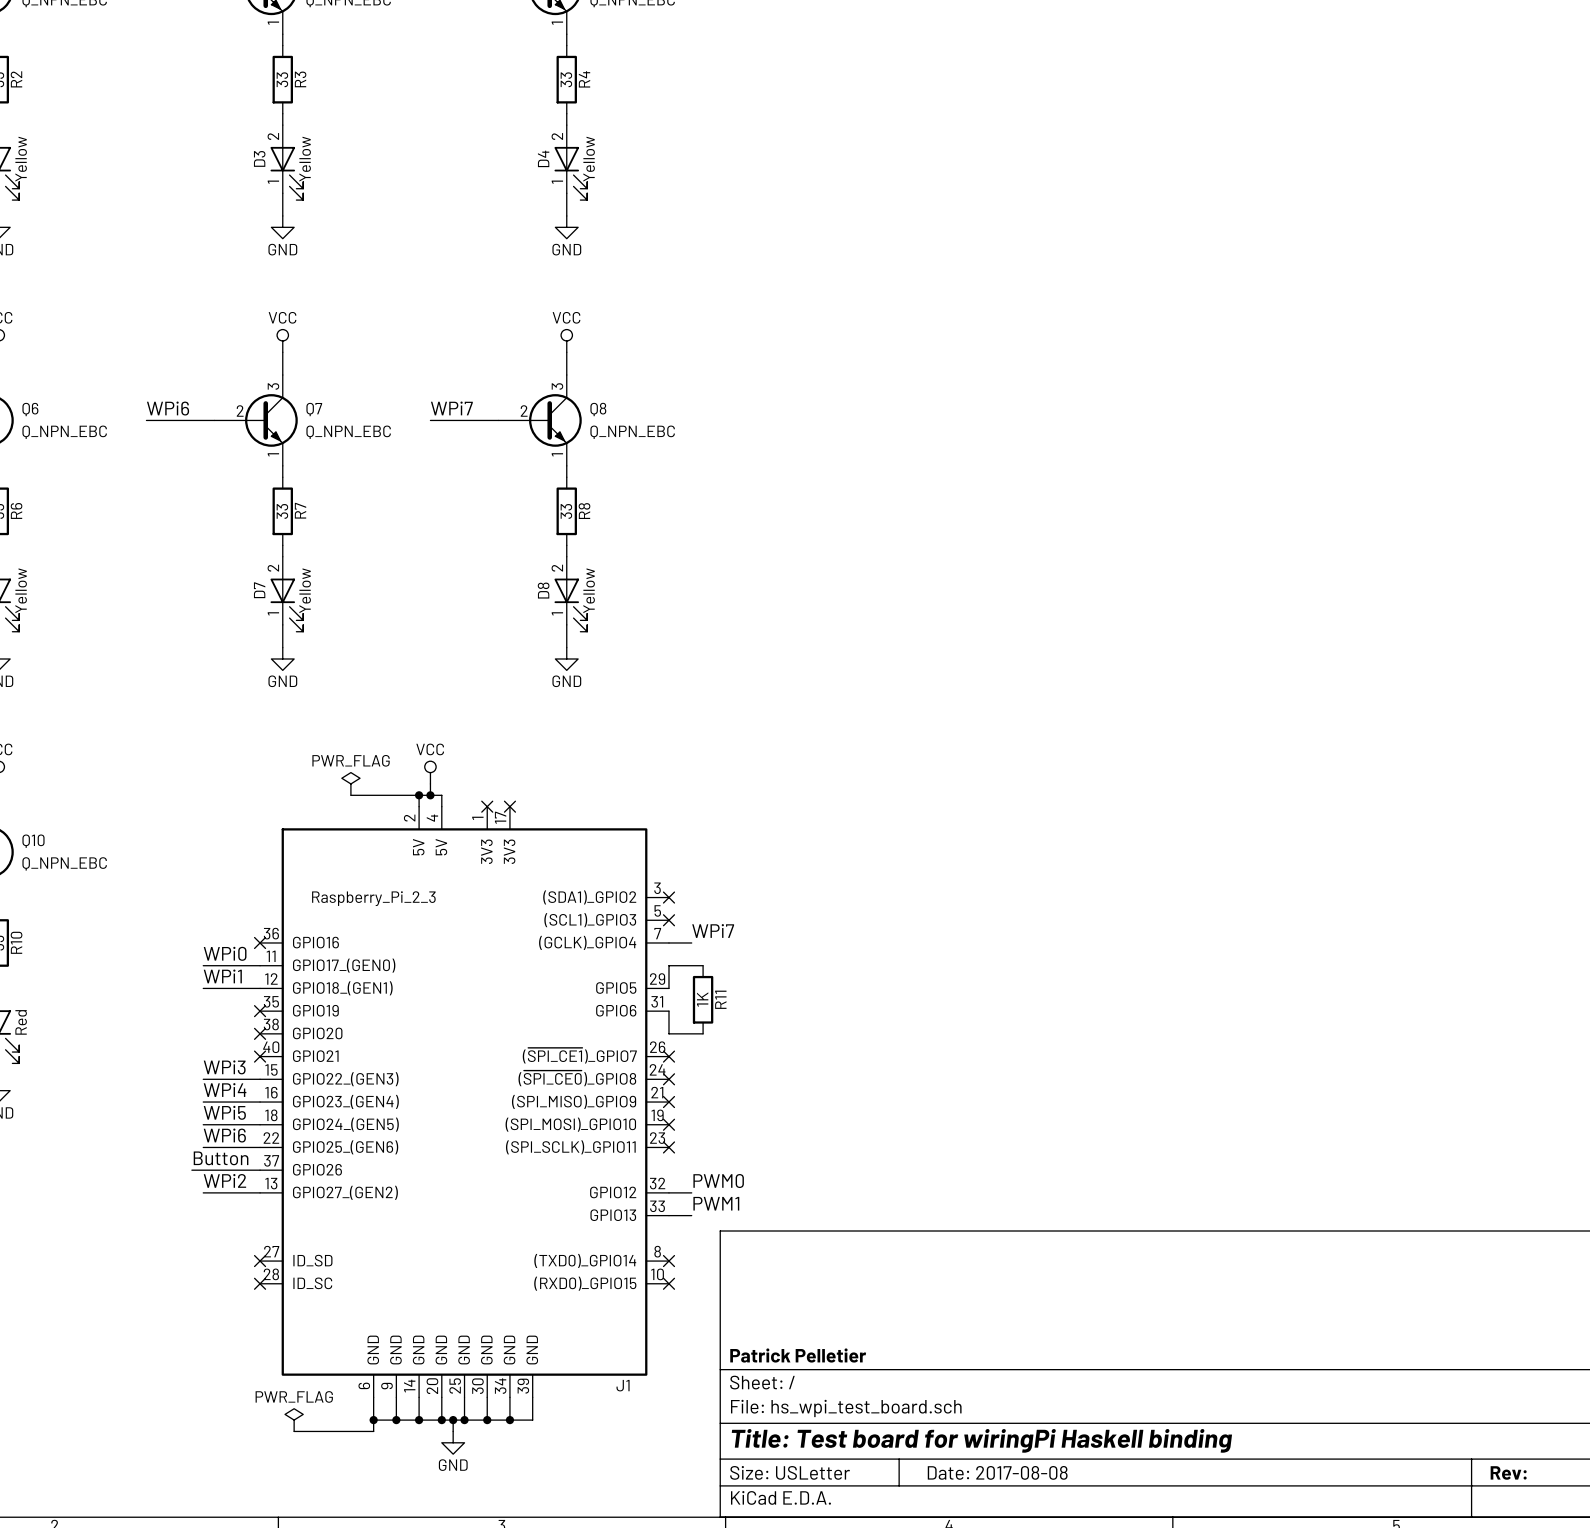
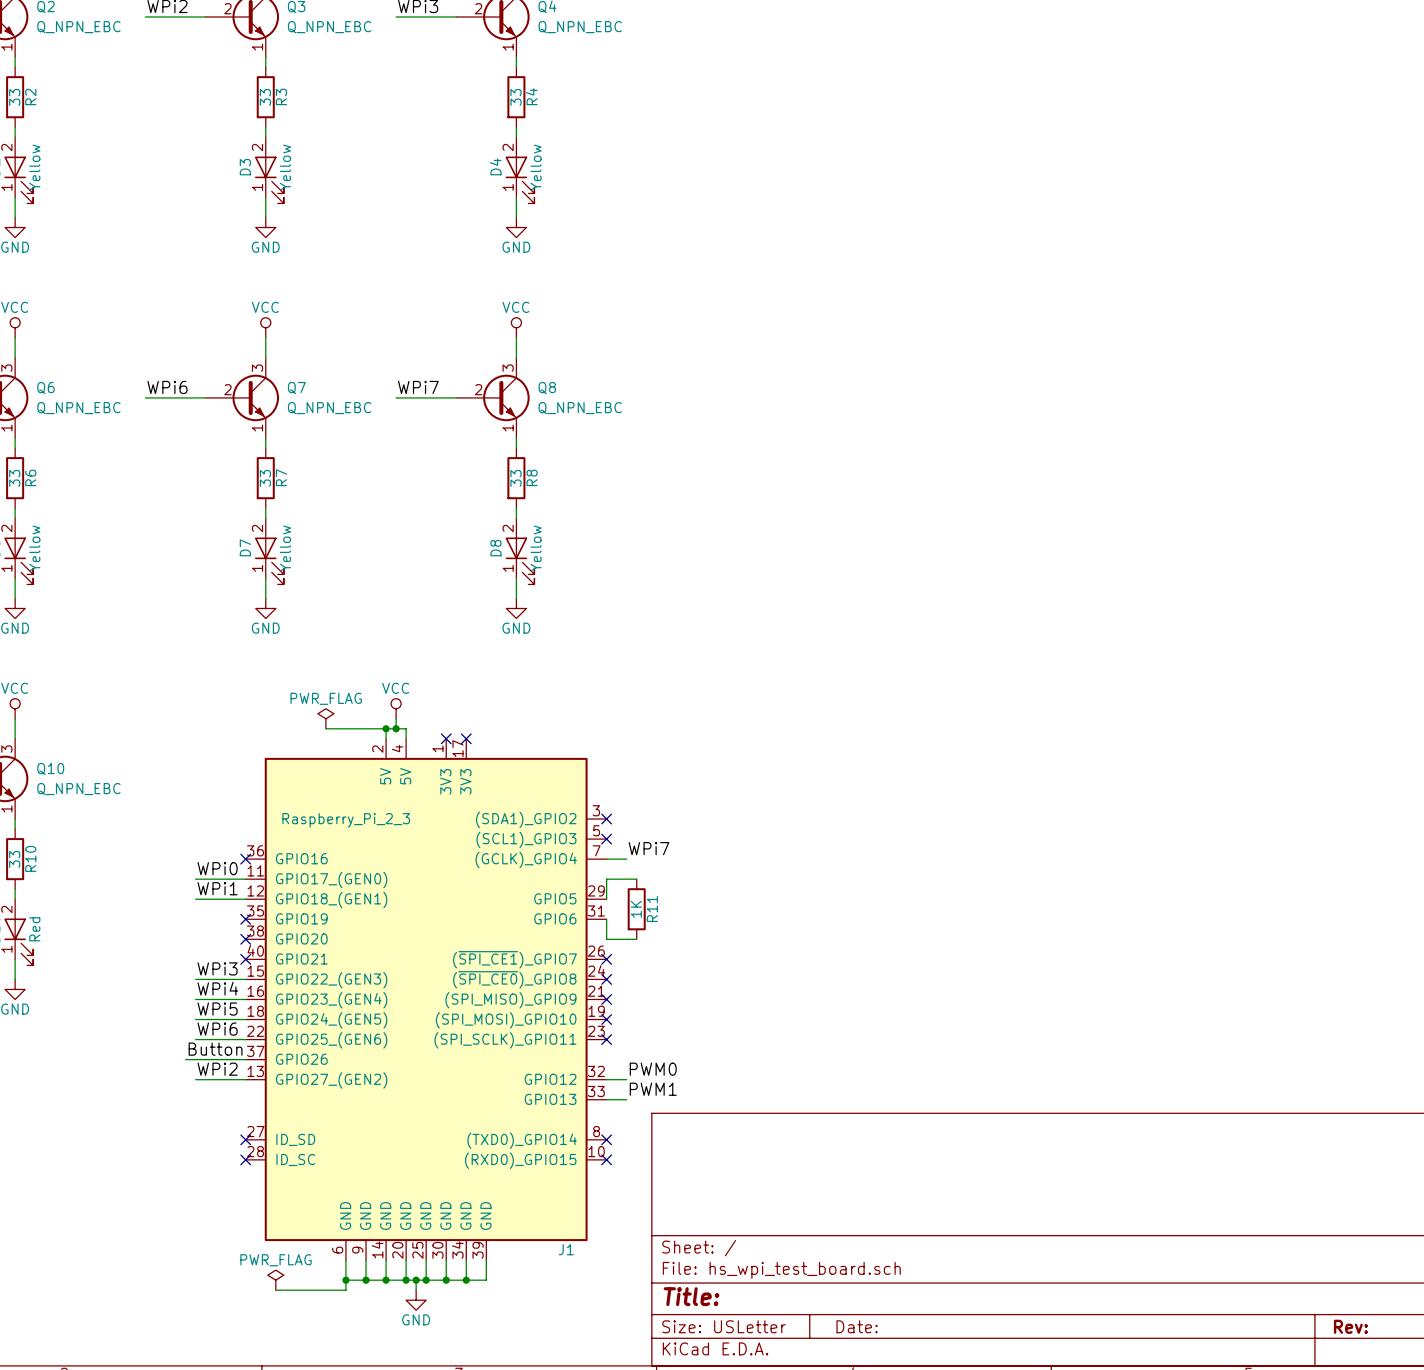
title block: Patrick Pelletier (798, 1355) -> none
title block: Title: Test board for wiringPi Haskell binding (981, 1440) -> Title: (691, 1296)
title block: Date: 2017-08-08 (997, 1472) -> Date: (857, 1326)

